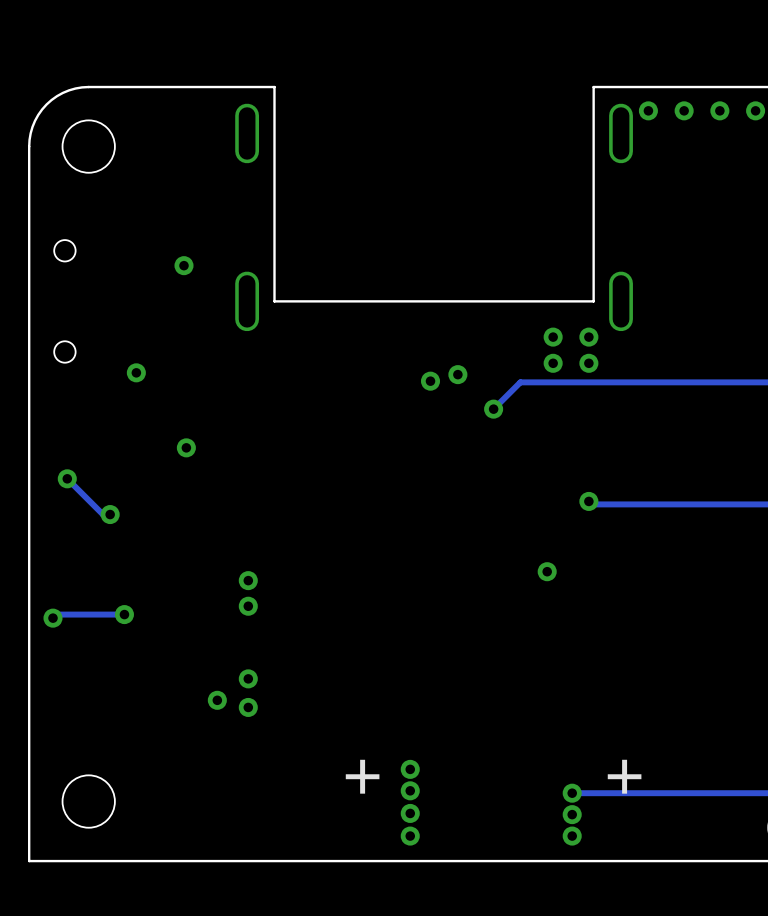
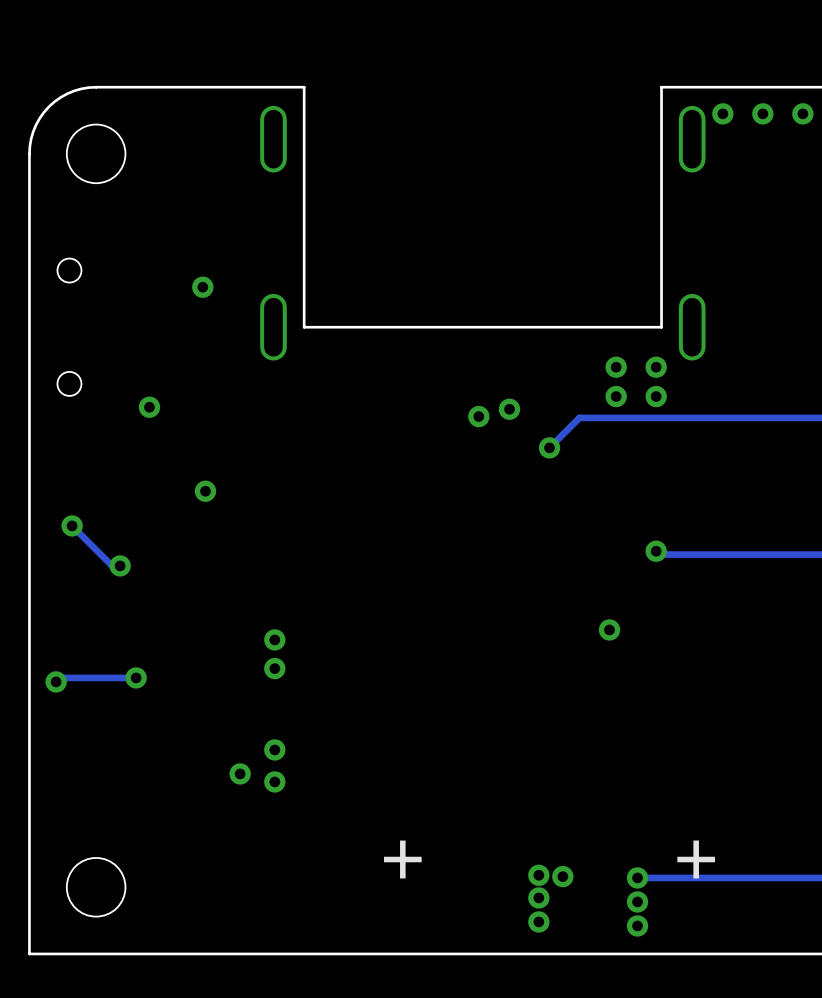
via: (410, 769) -> none
via: (410, 790) -> none
via: none -> (538, 875)
via: none -> (562, 876)
via: none -> (538, 897)
via: (410, 813) -> none
via: none -> (538, 921)
via: (410, 836) -> none

